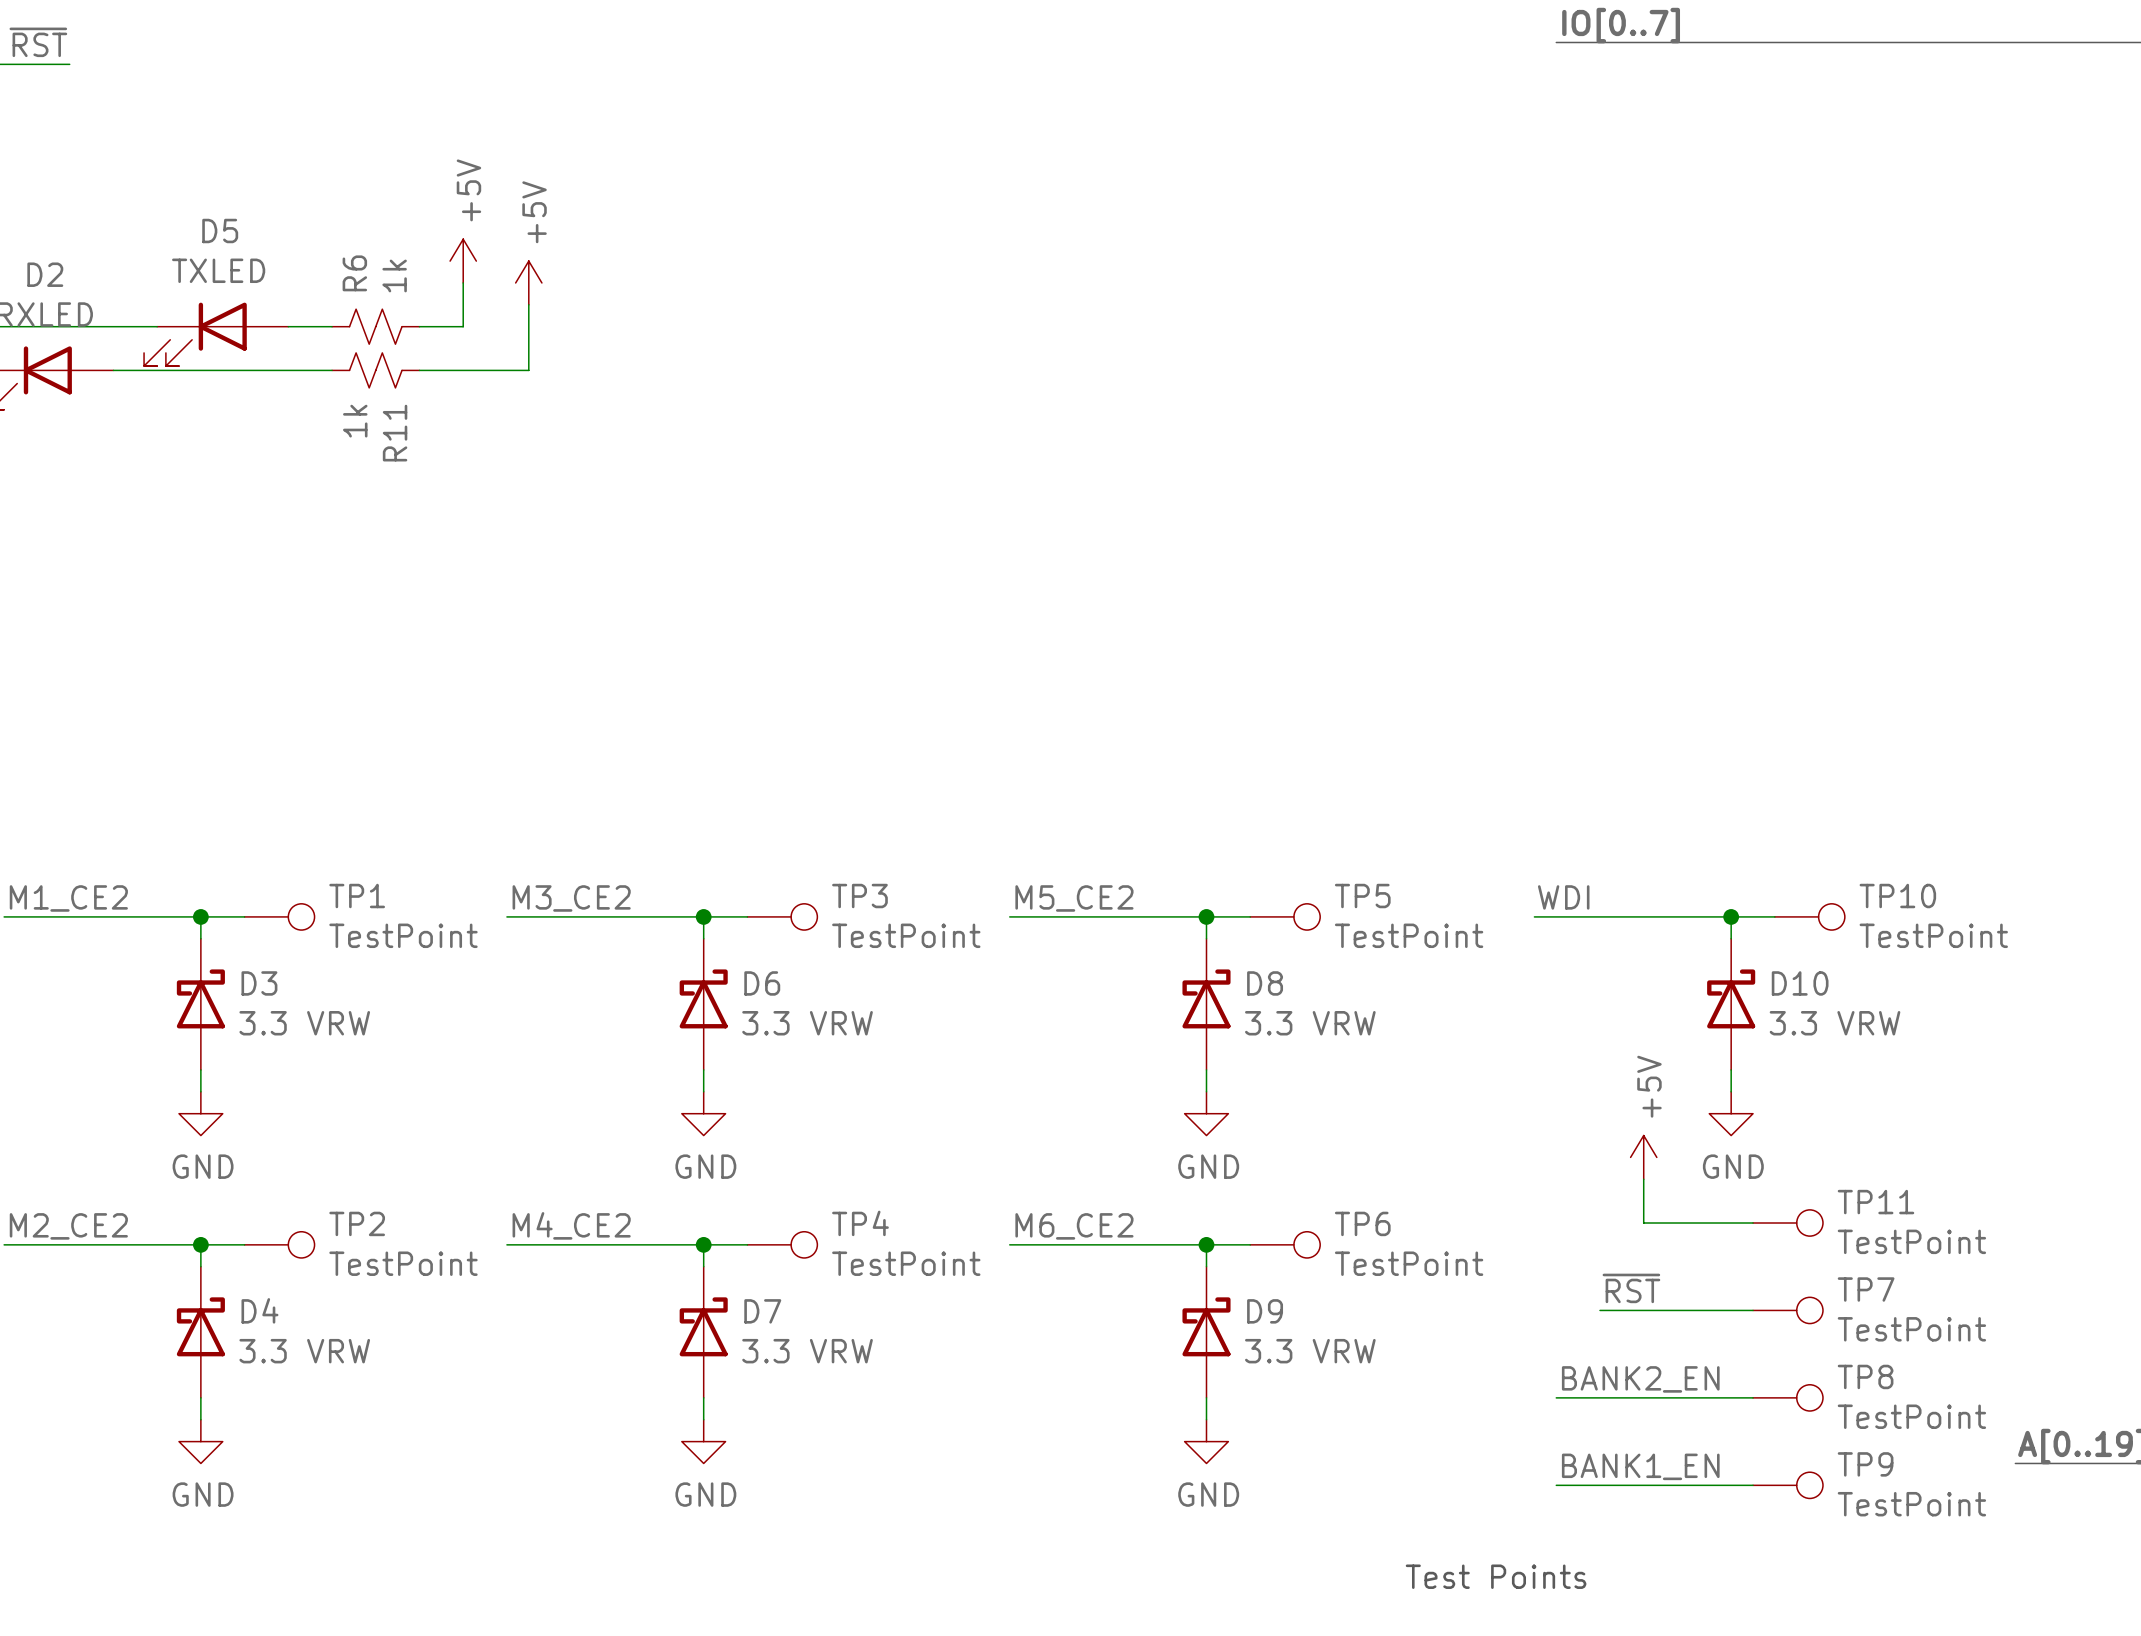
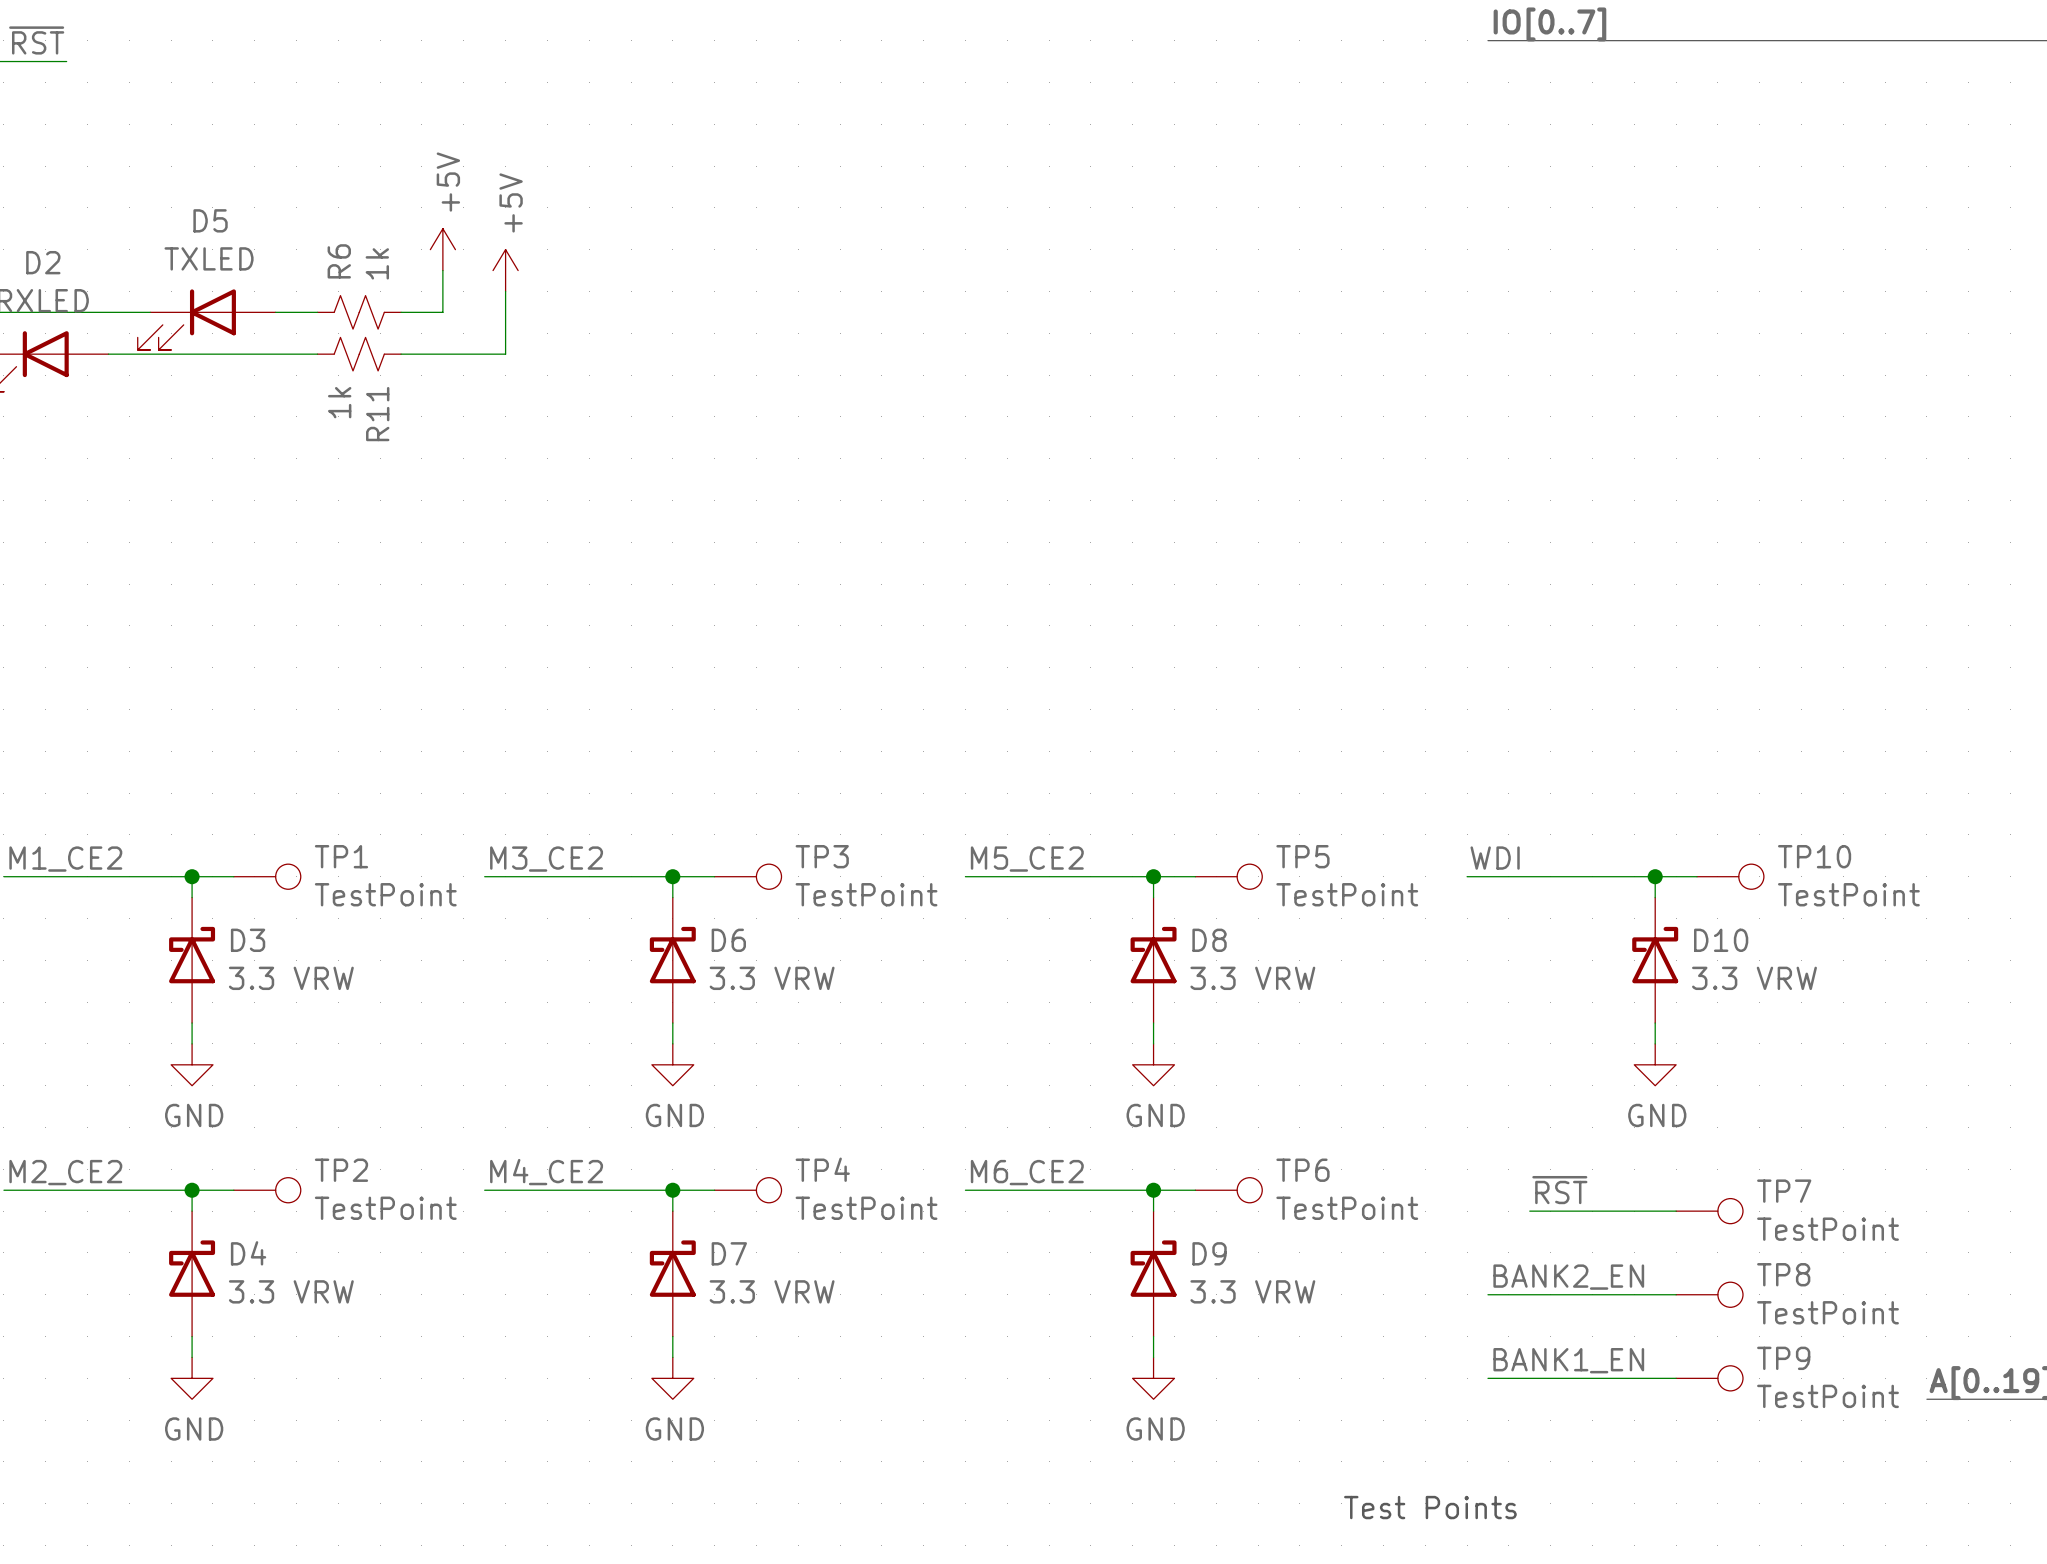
power symbol: +5V (1643, 1157) -> none
wire: (1643, 1179) (1643, 1223) (1753, 1223) -> none
TP11: TestPoint (1788, 1223) -> none
label position: ~{RST} (1631, 1288) -> ~{RST} (1559, 1190)
wire: (1599, 1310) (1753, 1310) -> (1529, 1211) (1676, 1211)
TP7 position: (1788, 1310) -> (1709, 1211)
label position: BANK2_EN (1640, 1379) -> BANK2_EN (1568, 1277)
wire: (1556, 1397) (1753, 1397) -> (1487, 1378) (1676, 1378)
TP8 position: (1788, 1397) -> (1709, 1294)
label position: BANK1_EN (1640, 1466) -> BANK1_EN (1568, 1360)
wire: (1556, 1485) (1753, 1485) -> (1487, 1294) (1676, 1294)
TP9 position: (1788, 1485) -> (1709, 1378)

